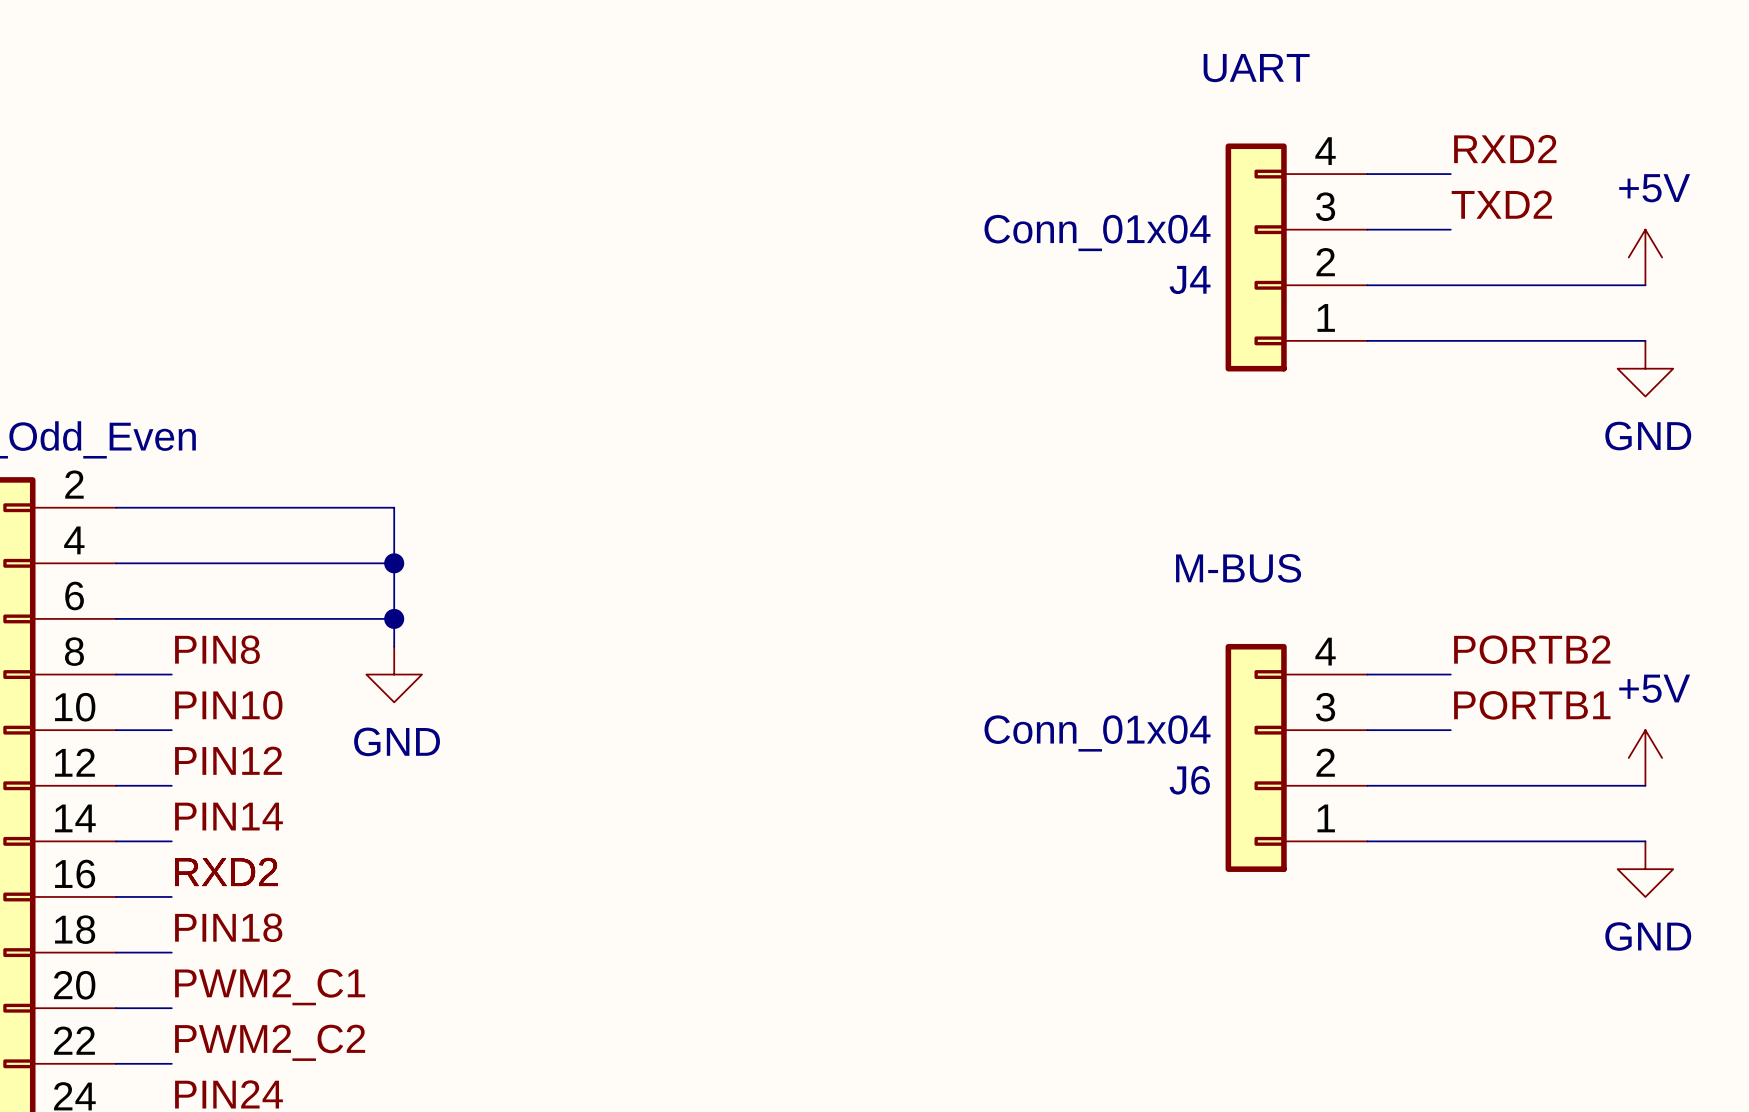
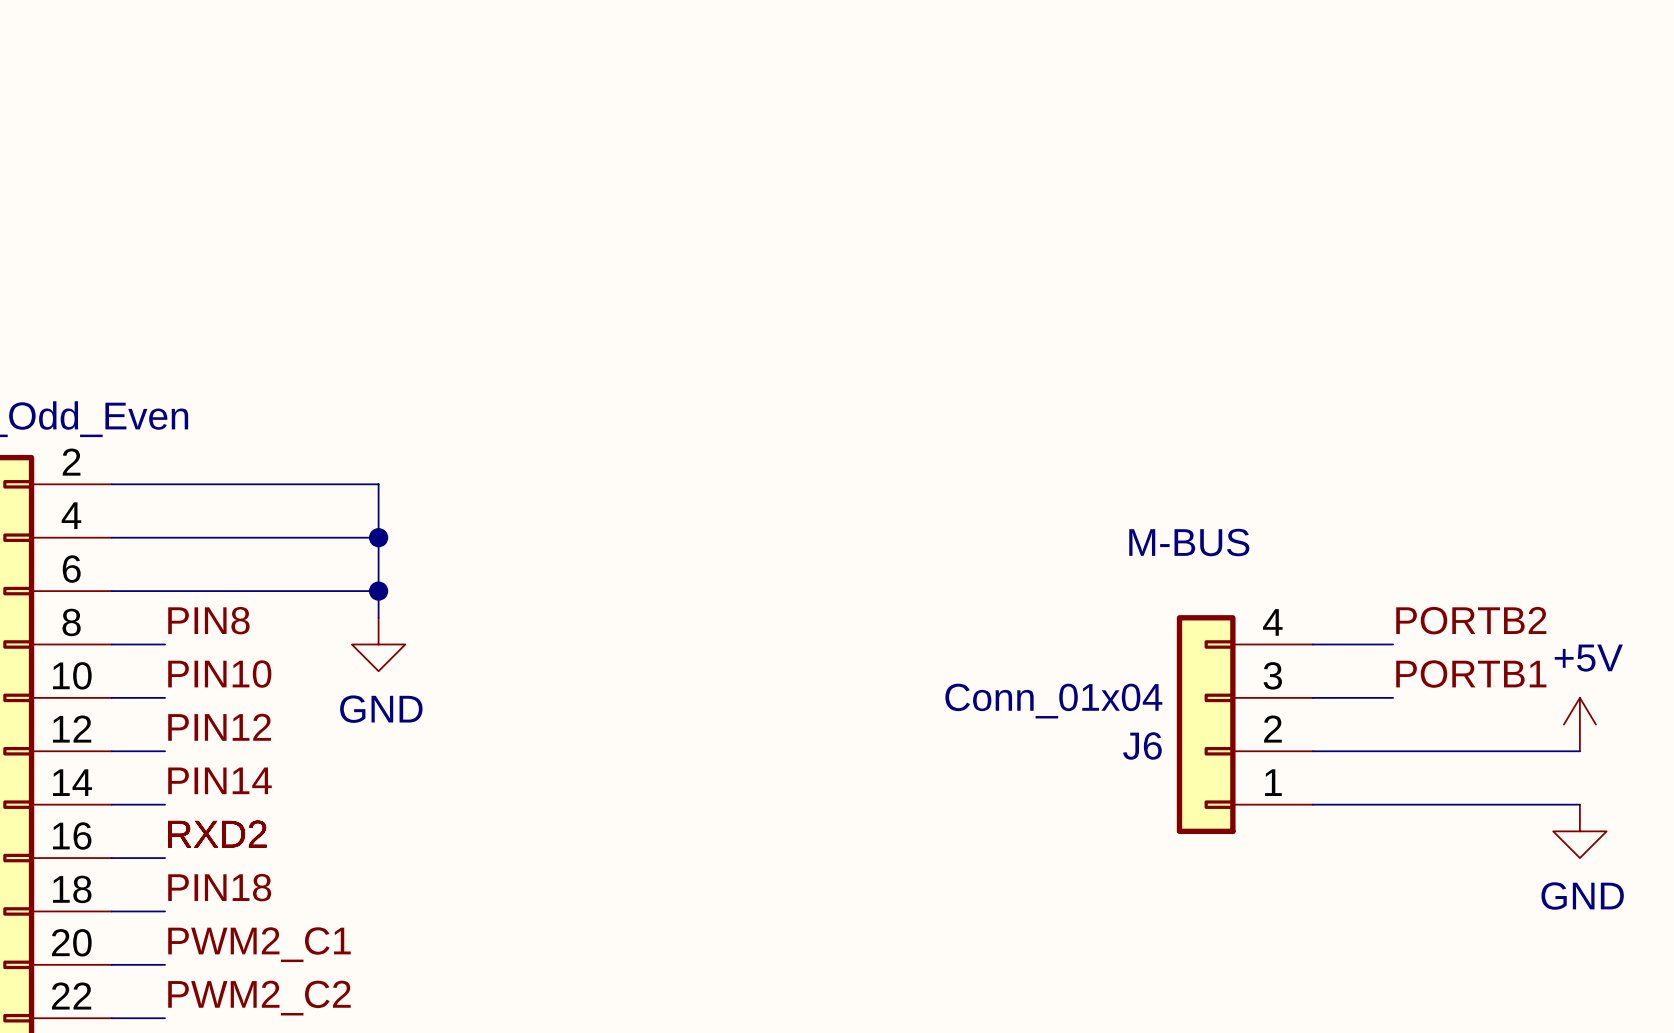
text: UART (1256, 68) -> none
label: RXD2 (1505, 149) -> none
wire: (1367, 174) (1450, 174) -> none
label: TXD2 (1501, 204) -> none
wire: (1367, 229) (1450, 229) -> none
J4: Conn_01x04 (1296, 257) -> none
power symbol: +5V (1645, 257) -> none
wire: (1367, 285) (1645, 285) -> none
wire: (1367, 340) (1645, 340) -> none
power symbol: GND (1645, 368) -> none

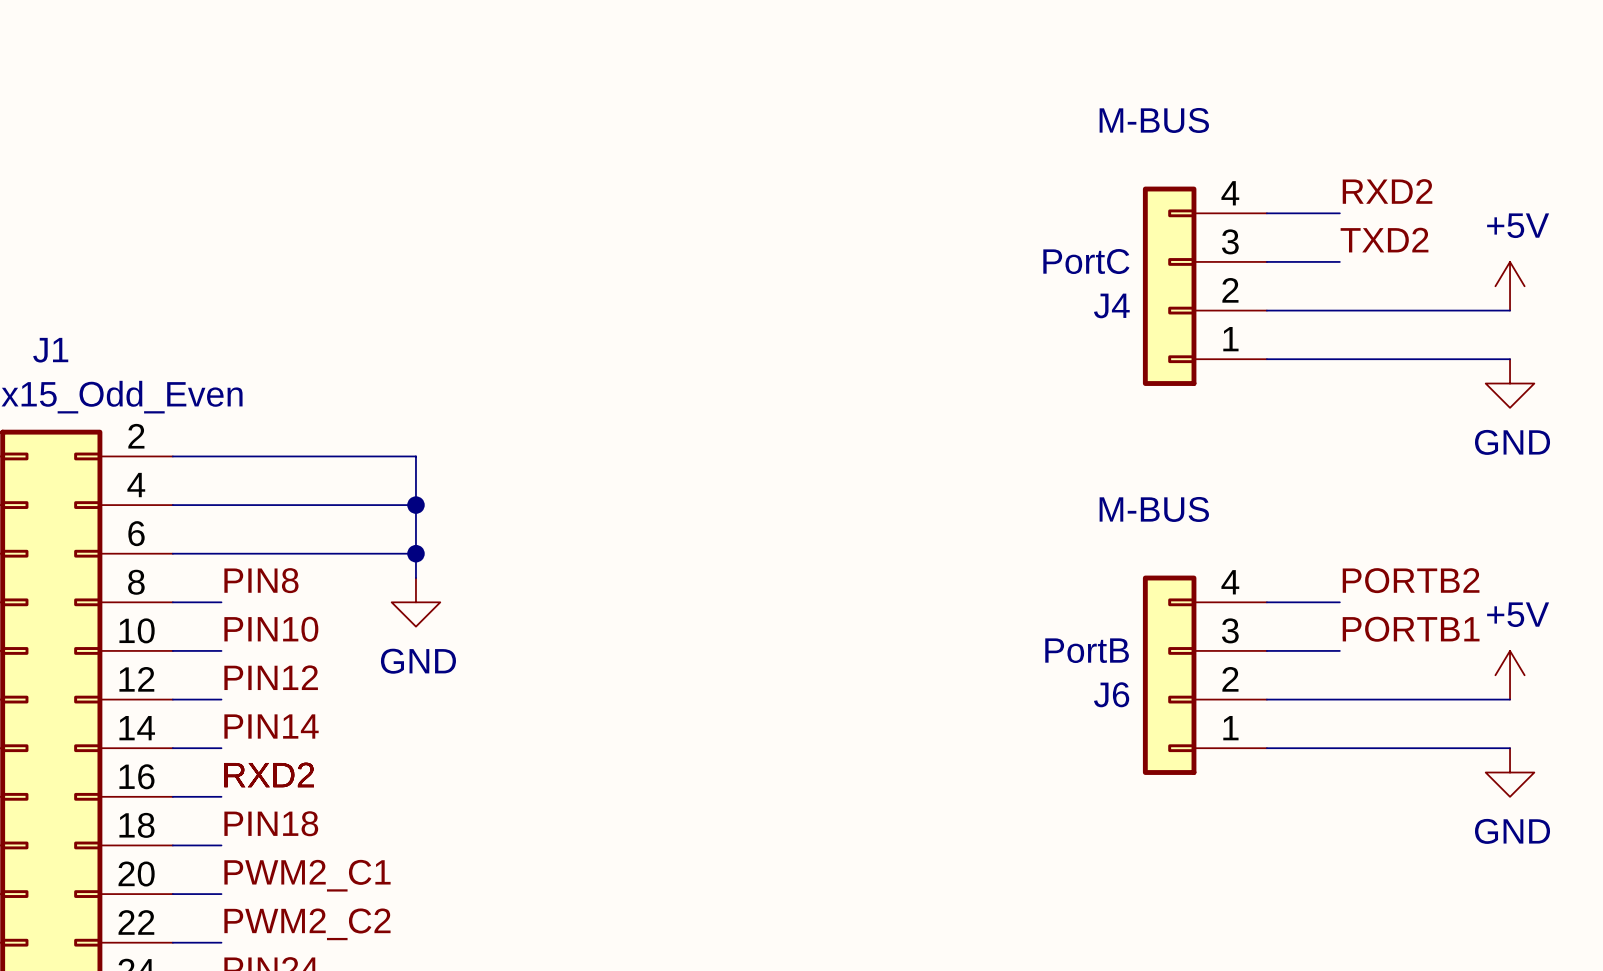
text: none -> M-BUS (1154, 120)
label: none -> RXD2 (1387, 191)
wire: none -> (1266, 213) (1339, 213)
label: none -> TXD2 (1384, 240)
wire: none -> (1266, 261) (1339, 261)
J4: none -> PortC (1204, 286)
power symbol: none -> +5V (1510, 286)
wire: none -> (1266, 310) (1510, 310)
wire: none -> (1266, 359) (1510, 359)
power symbol: none -> GND (1510, 383)
J6 value: Conn_01x04 (1053, 701) -> PortB (1087, 650)

